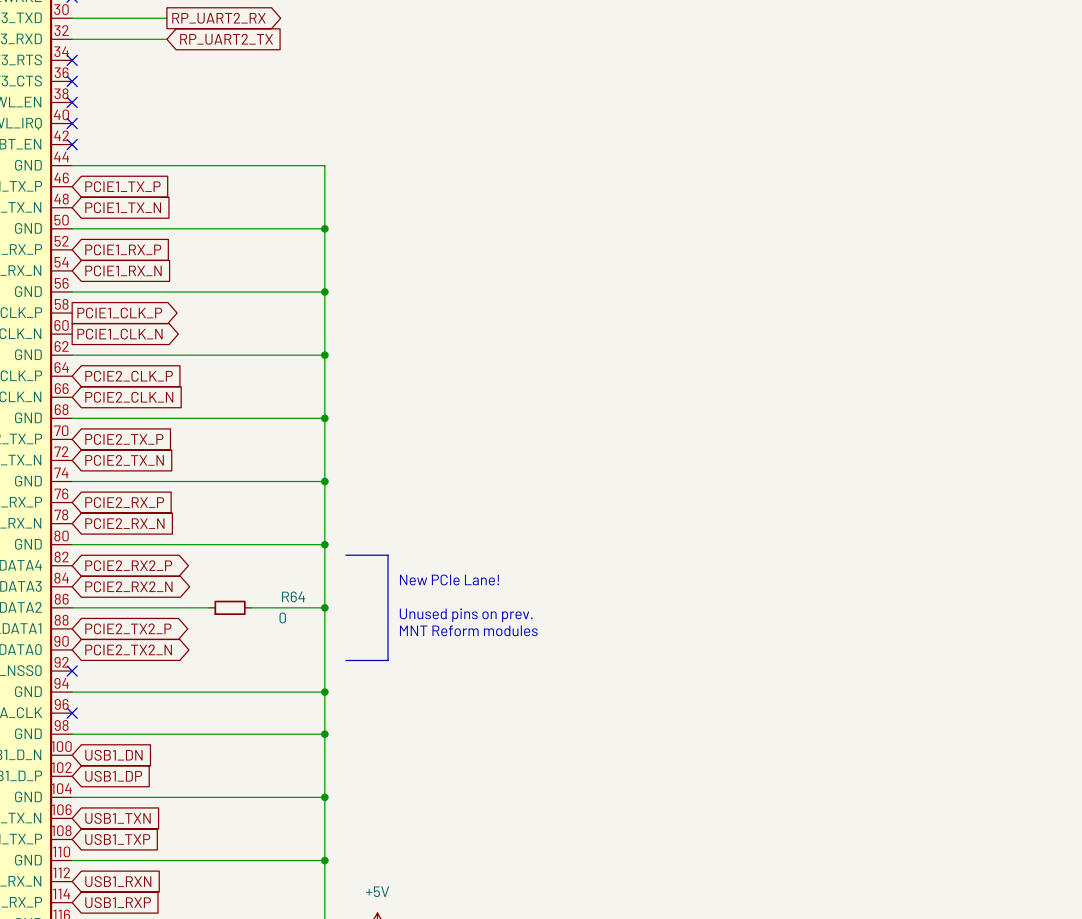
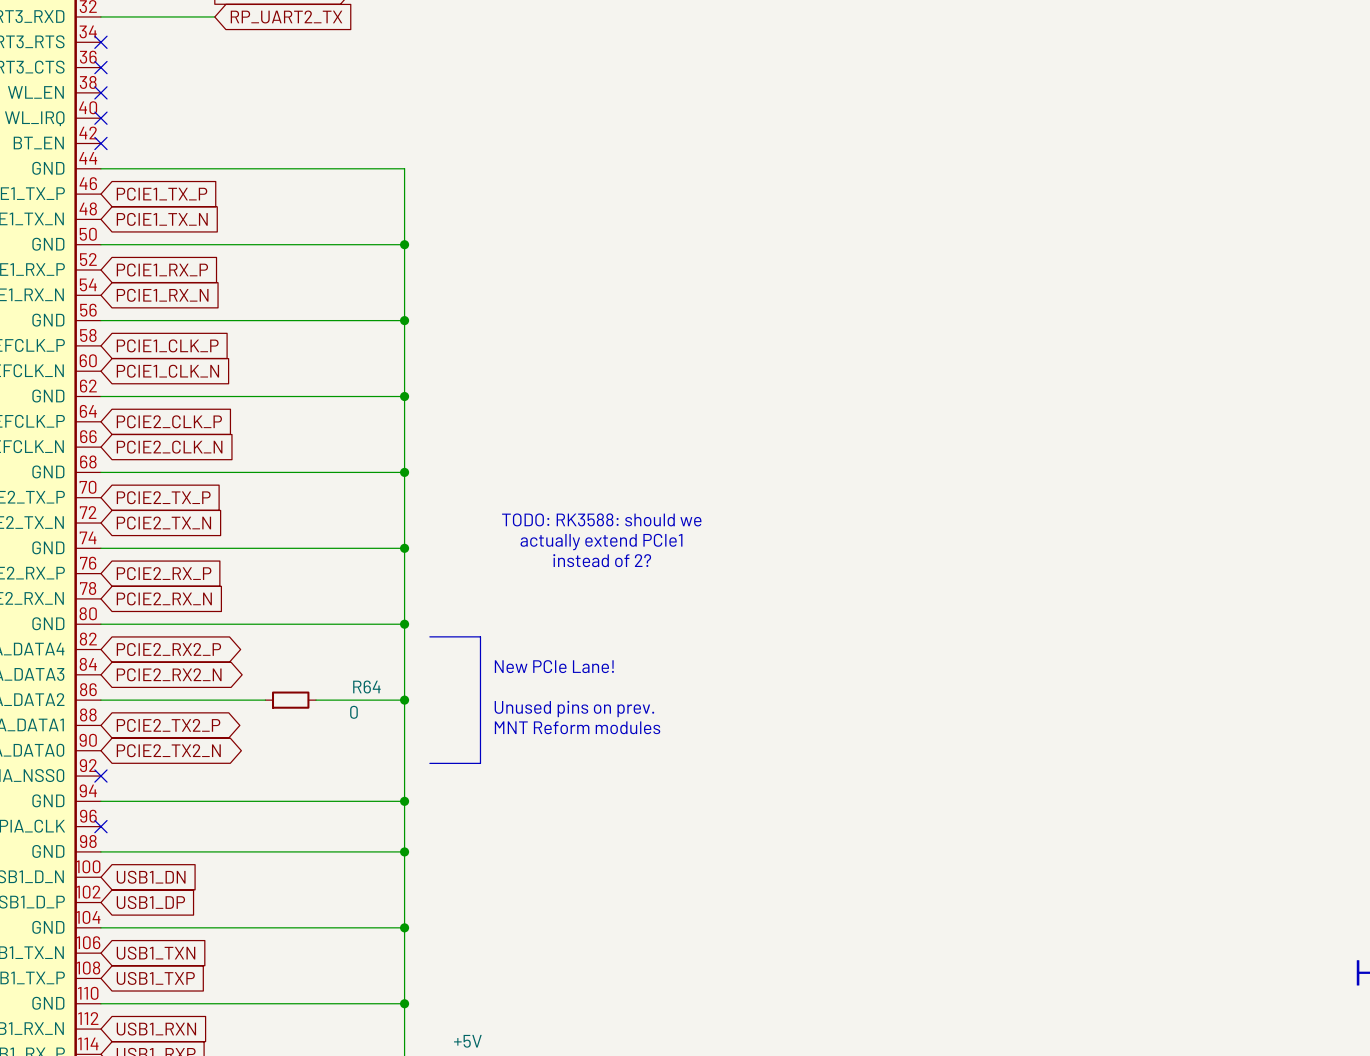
global label shape: output (119, 313) -> input (167, 345)
global label shape: output (119, 334) -> input (167, 371)
text: none -> TODO: RK3588: should we (601, 519)
text: none -> actually extend PCIe1 (601, 542)
text: none -> instead of 2? (602, 560)

